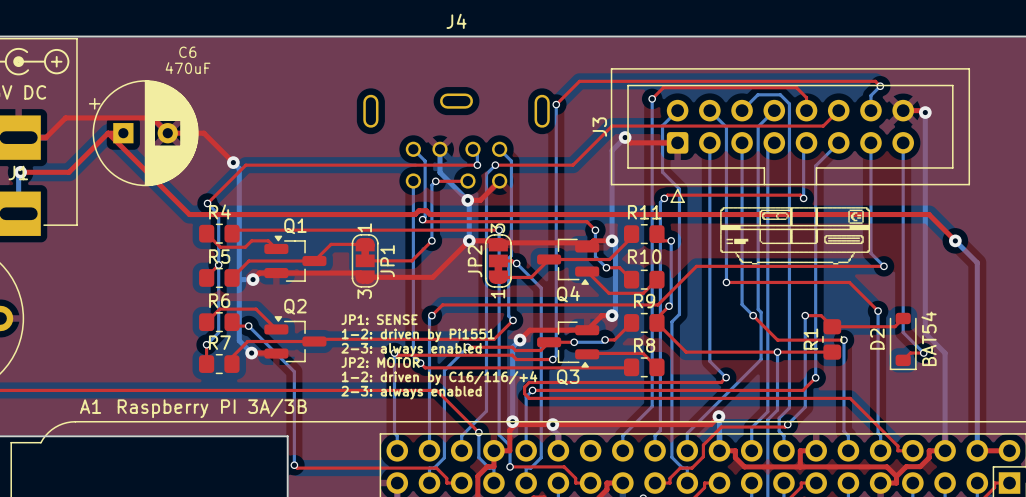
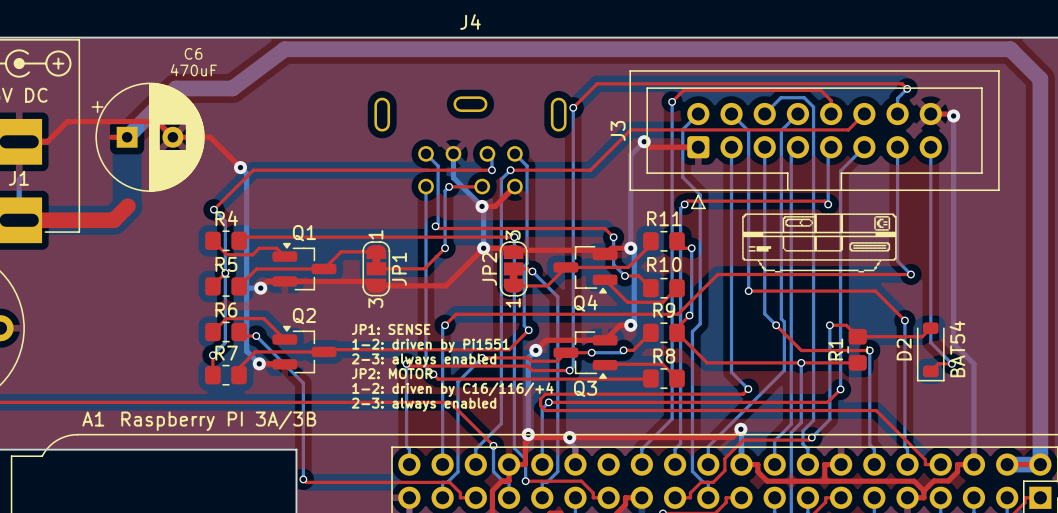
top track: (20, 172) (68, 172) (108, 133) (189, 214) (415, 214) (418, 210) (426, 210) (430, 214) (929, 214) (955, 240) -> none
via: (20, 172) -> none
top track: none -> (127, 206) (113, 220) (19, 220)
bottom track: (955, 240) (977, 262) (977, 450) -> (127, 137) (175, 88) (232, 88) (284, 49) (1010, 49) (1040, 79) (1040, 464) (1007, 464)
via: (955, 240) -> none

